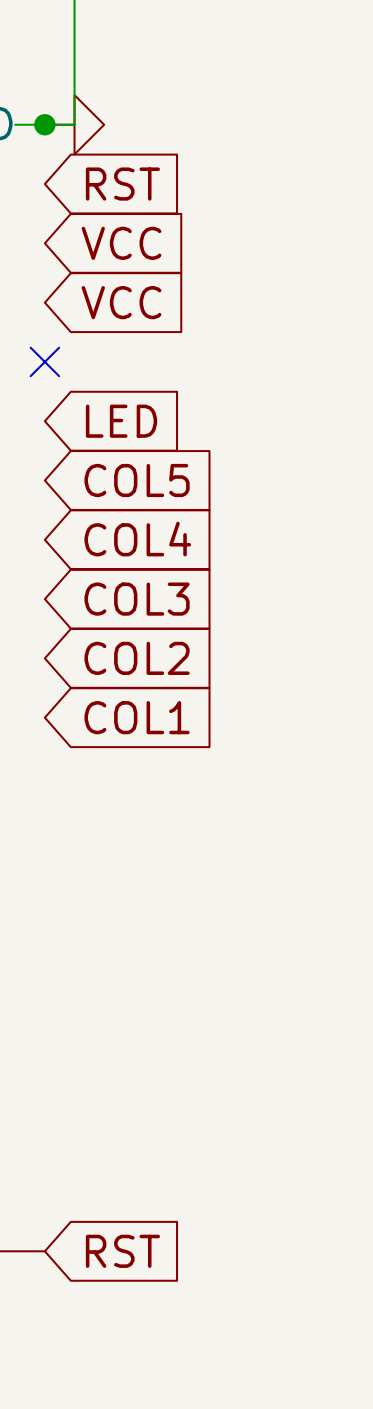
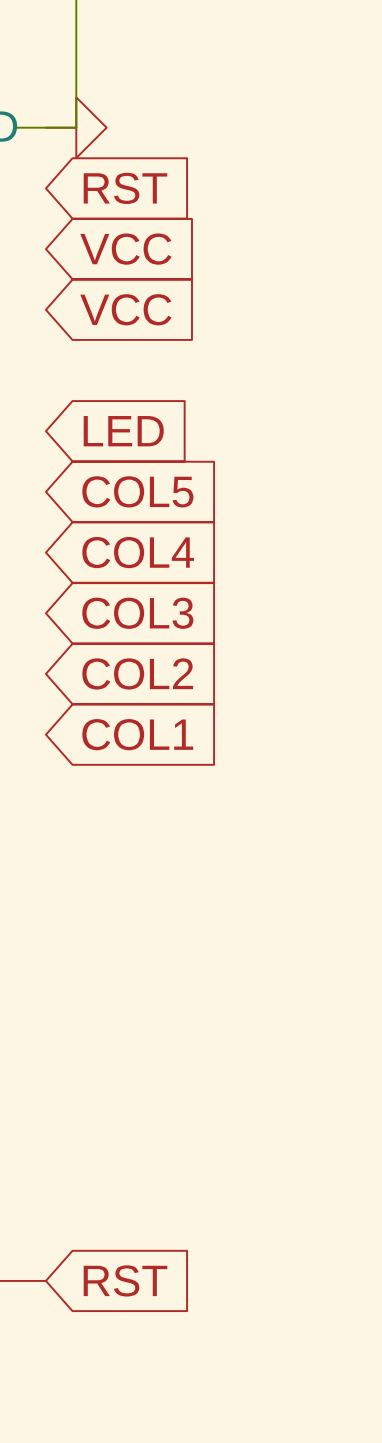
junction: (44, 124) -> none
no-connect mark: (44, 361) -> none

